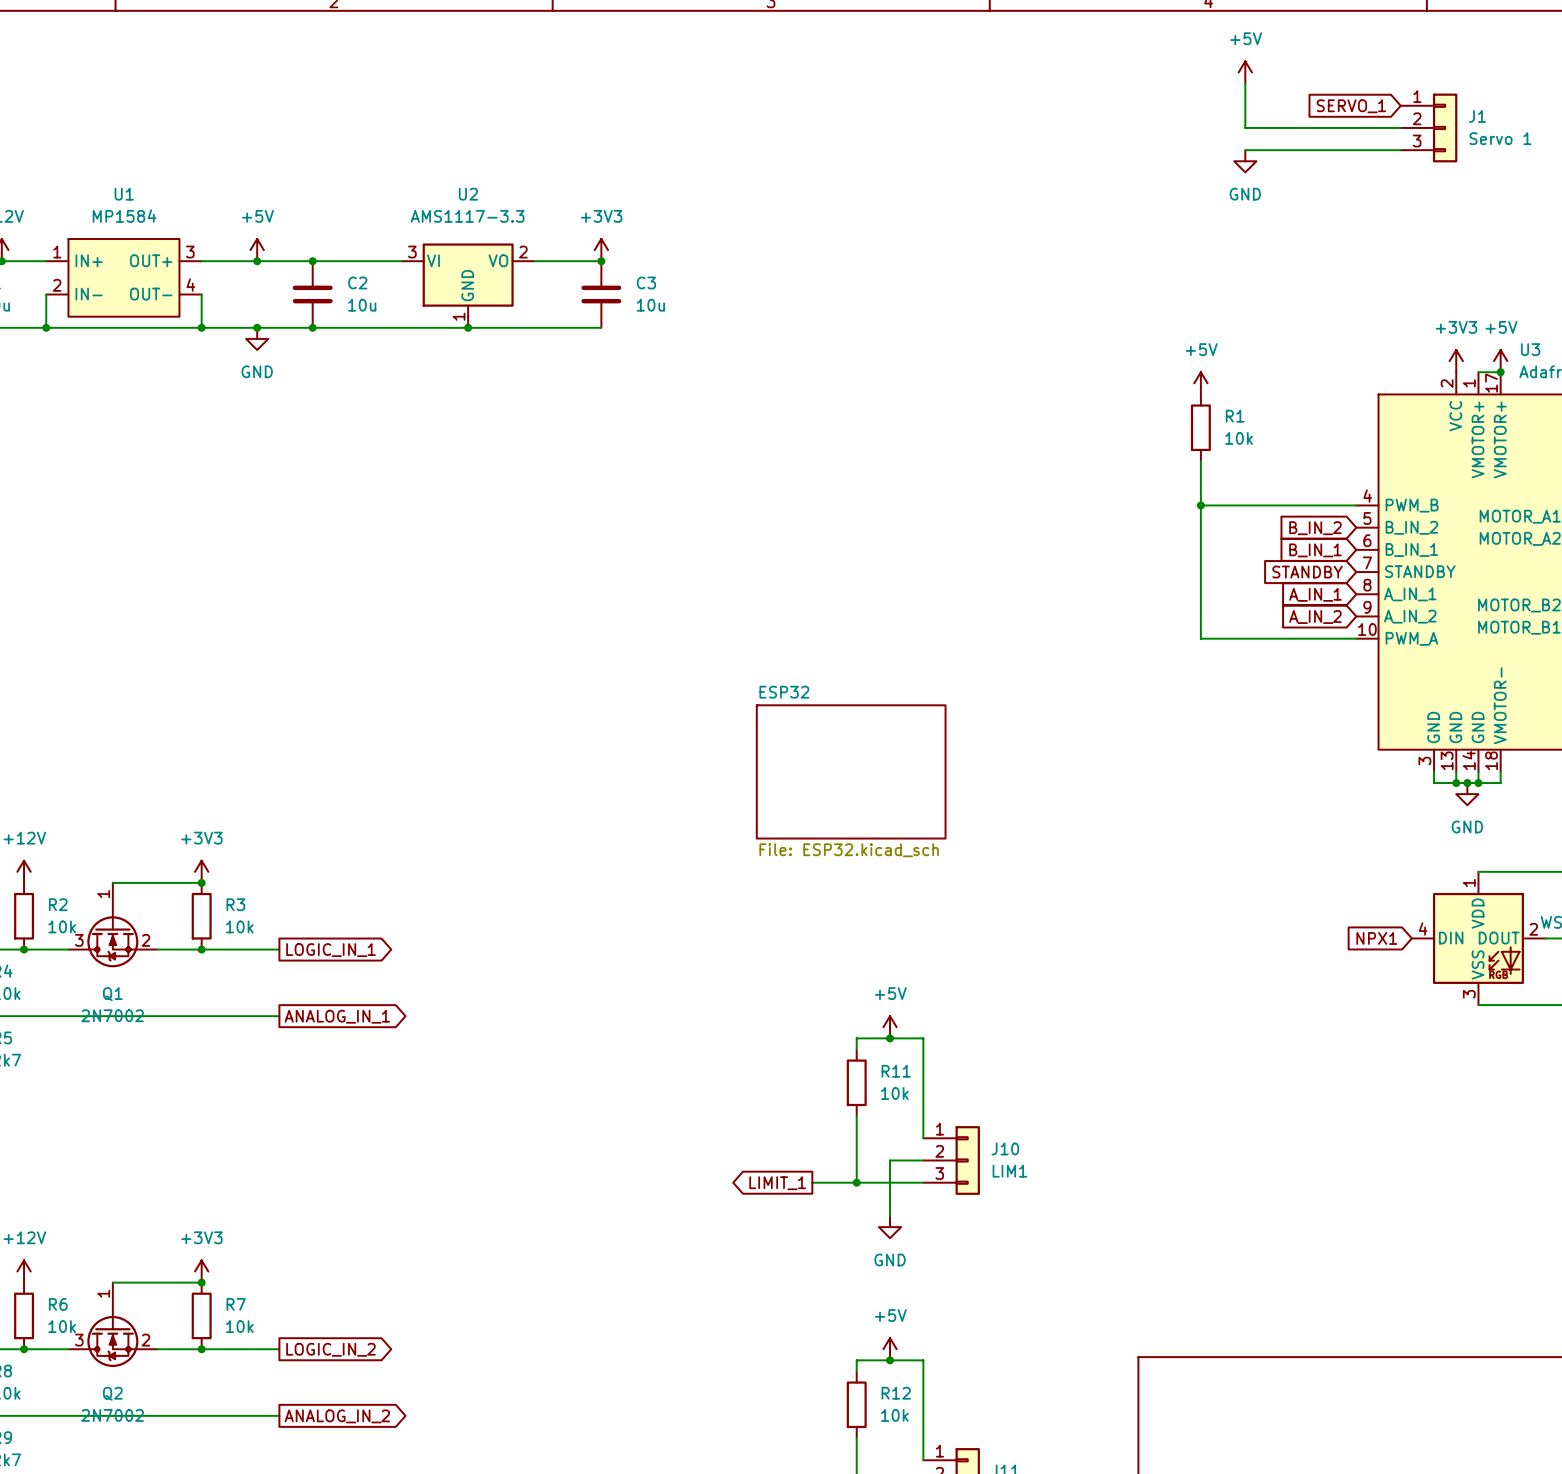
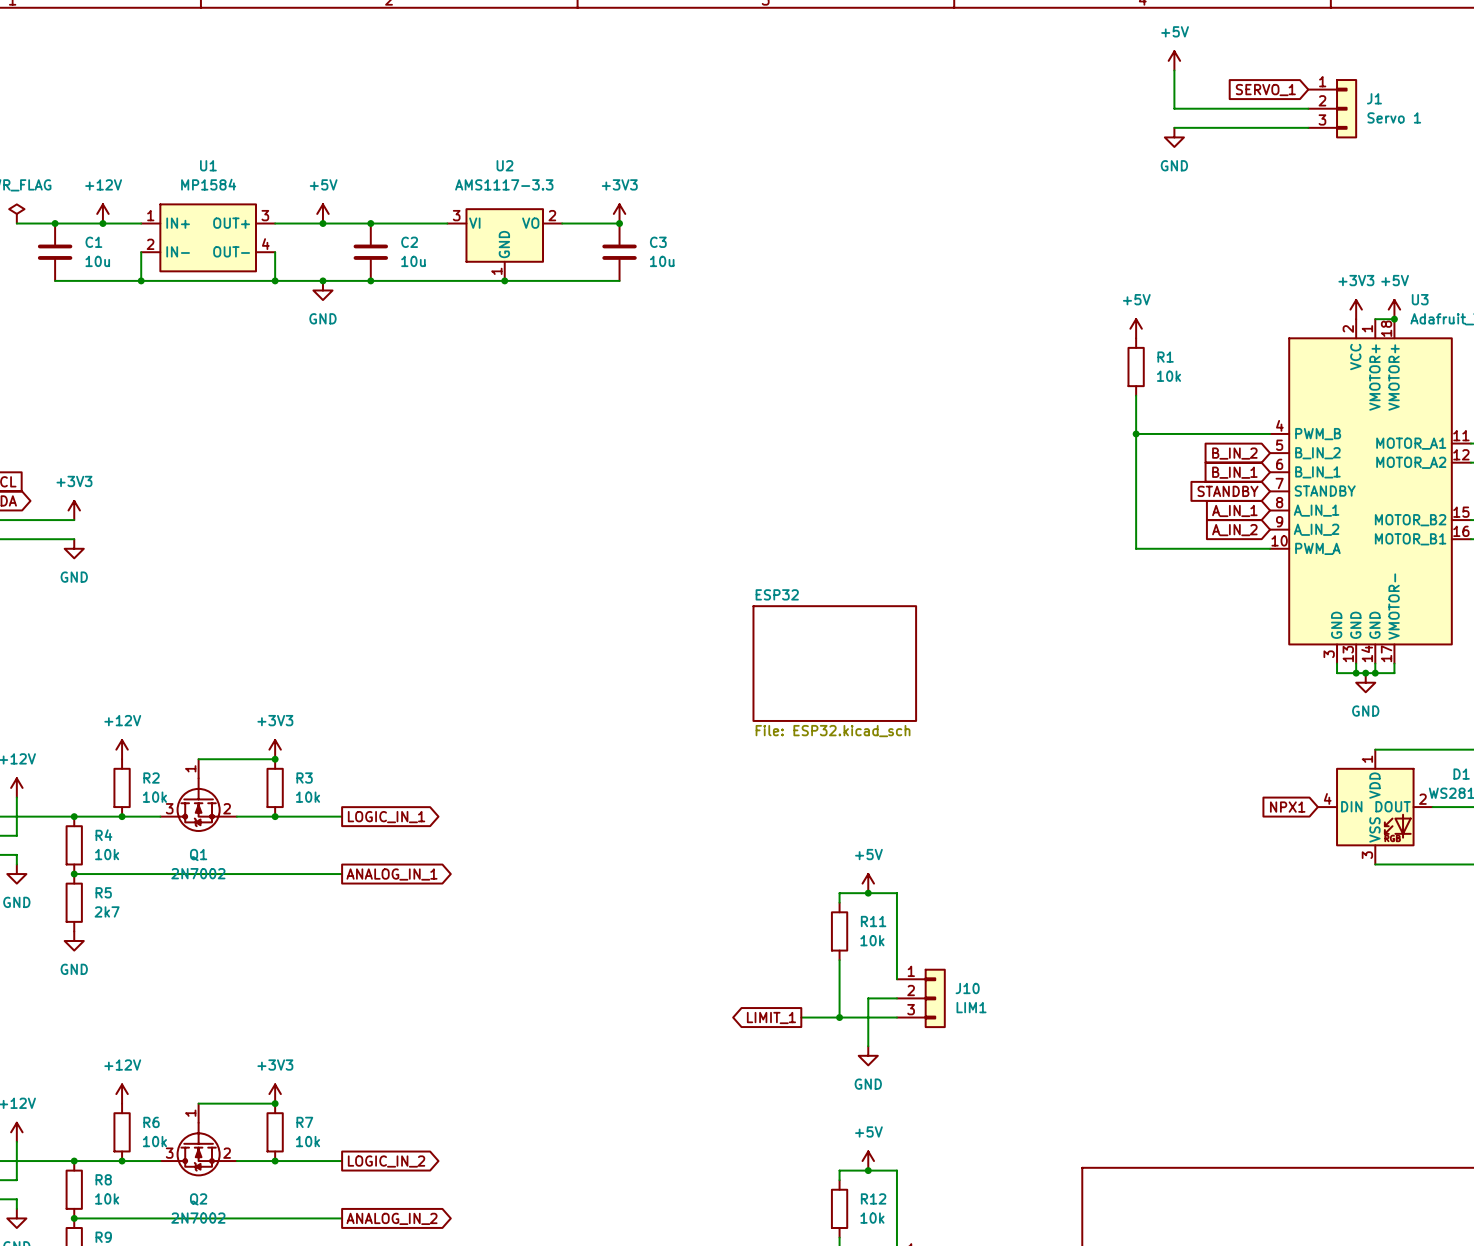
U3 pin number: 17 (1491, 383) -> 18 (1386, 328)
U3 pin number: 18 (1491, 760) -> 17 (1386, 653)

